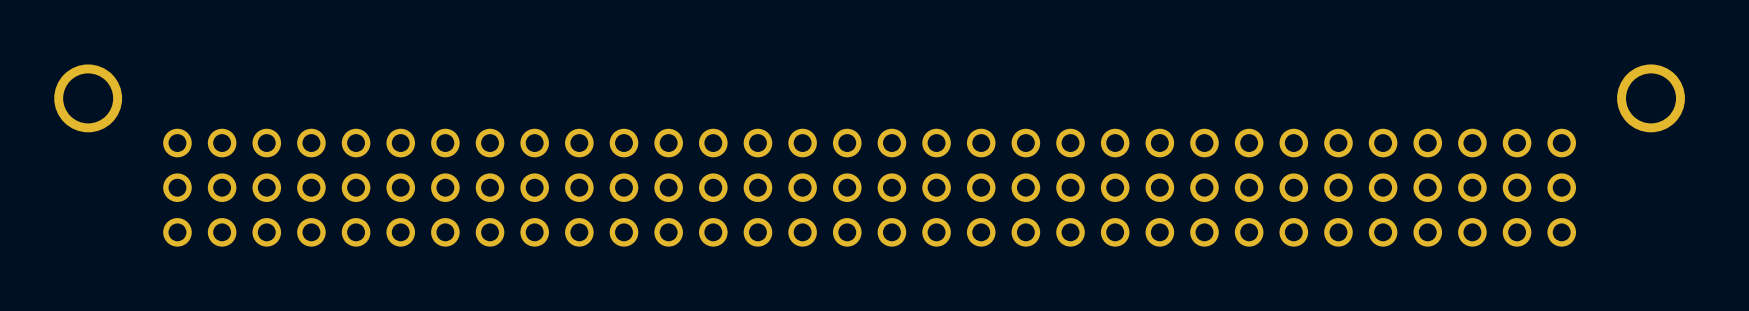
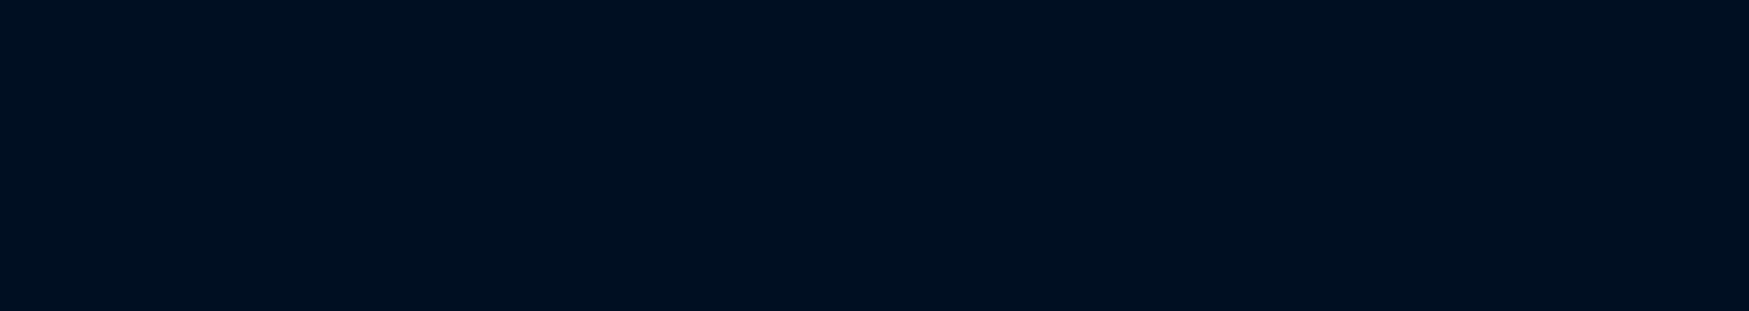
part: (869, 155) -> none

